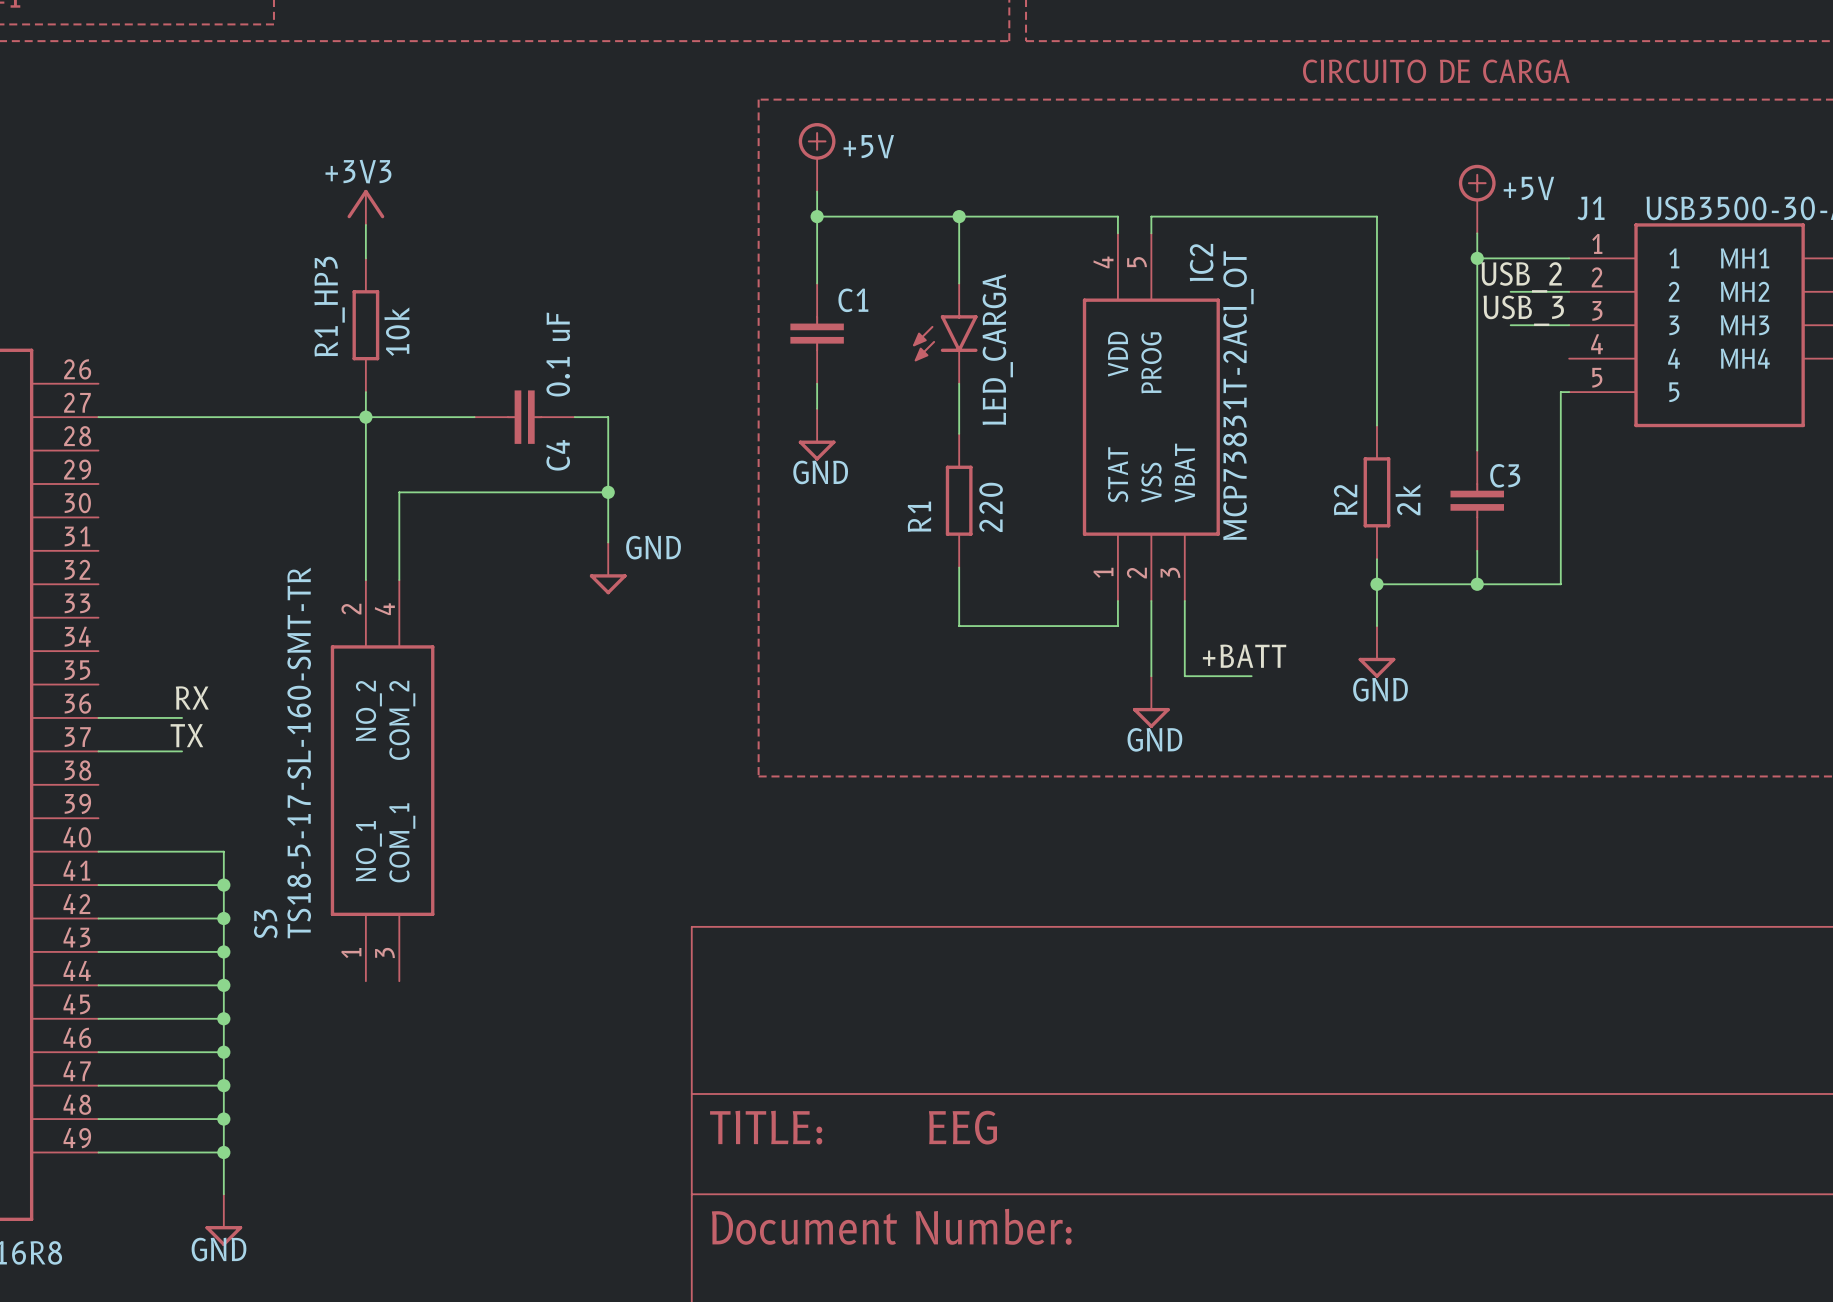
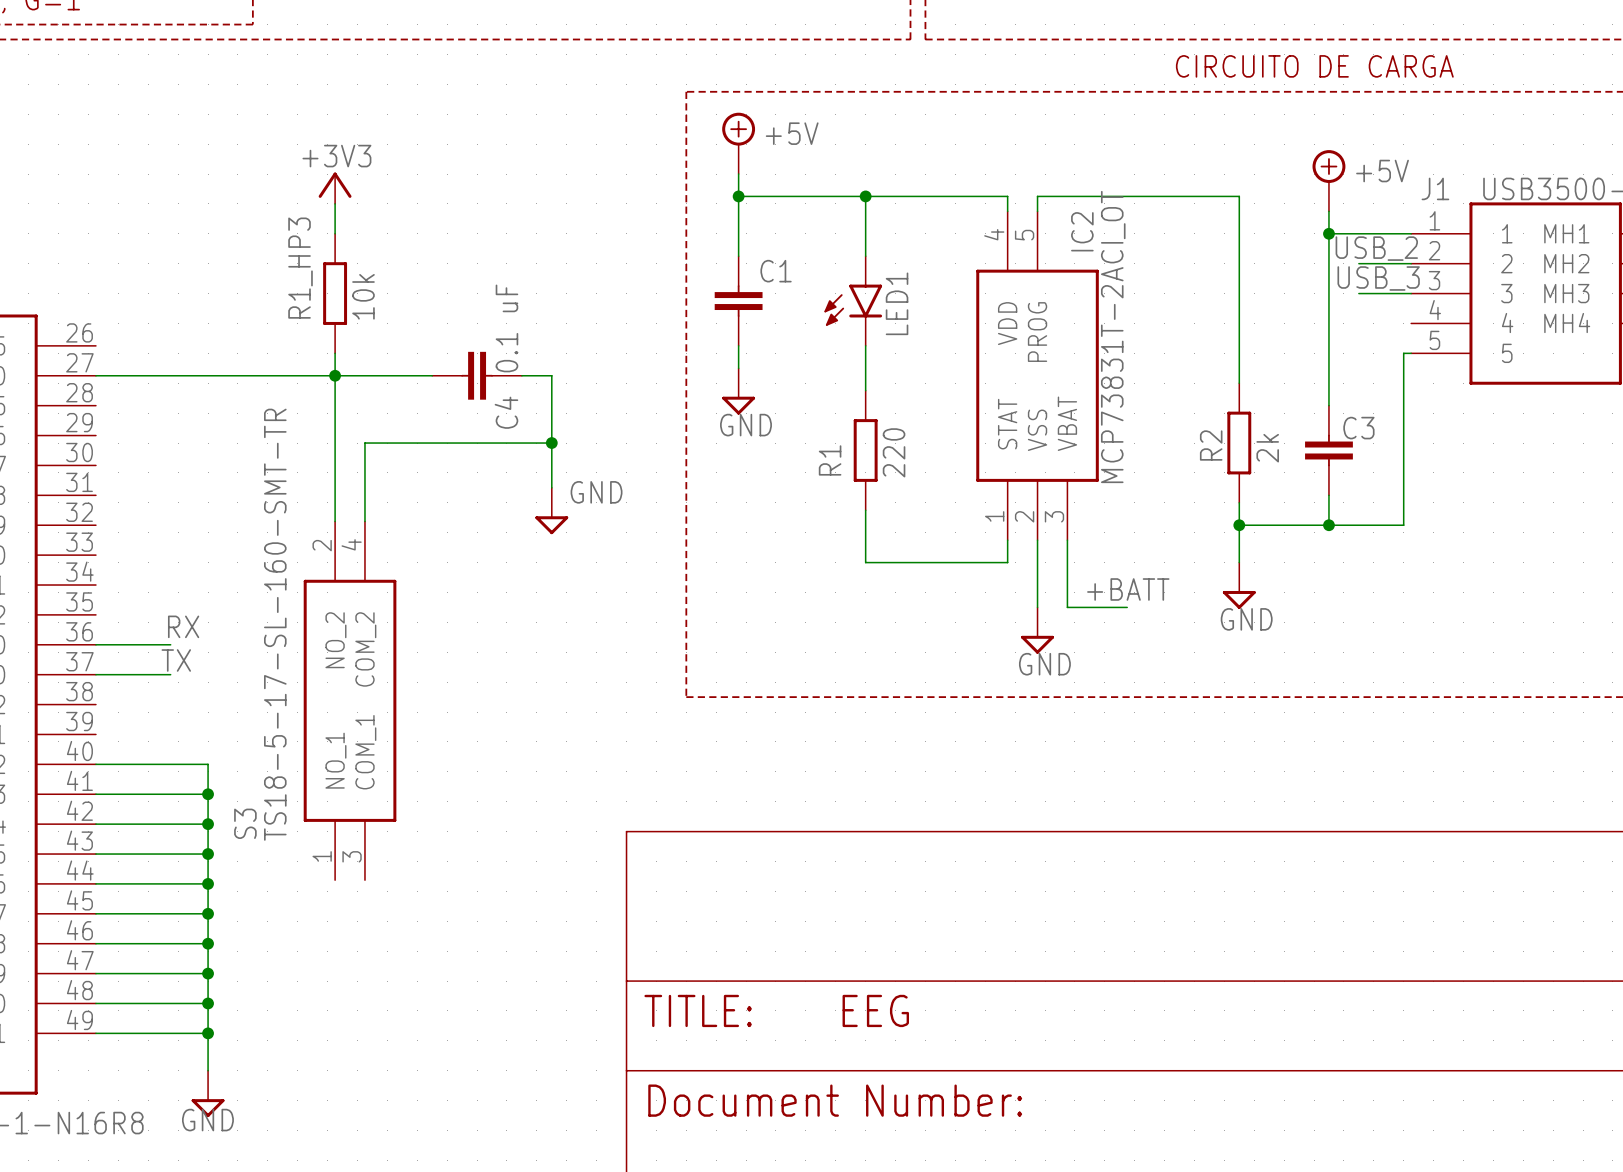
LED_CARGA name: LED_CARGA (997, 349) -> LED1 (897, 303)

